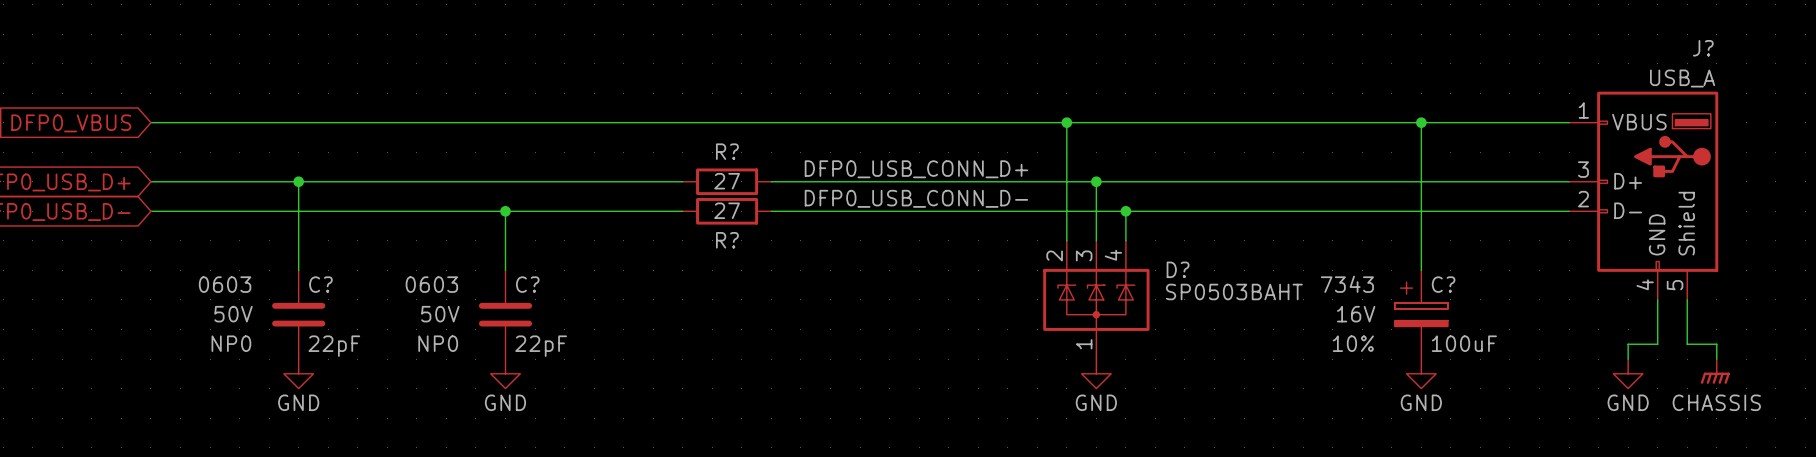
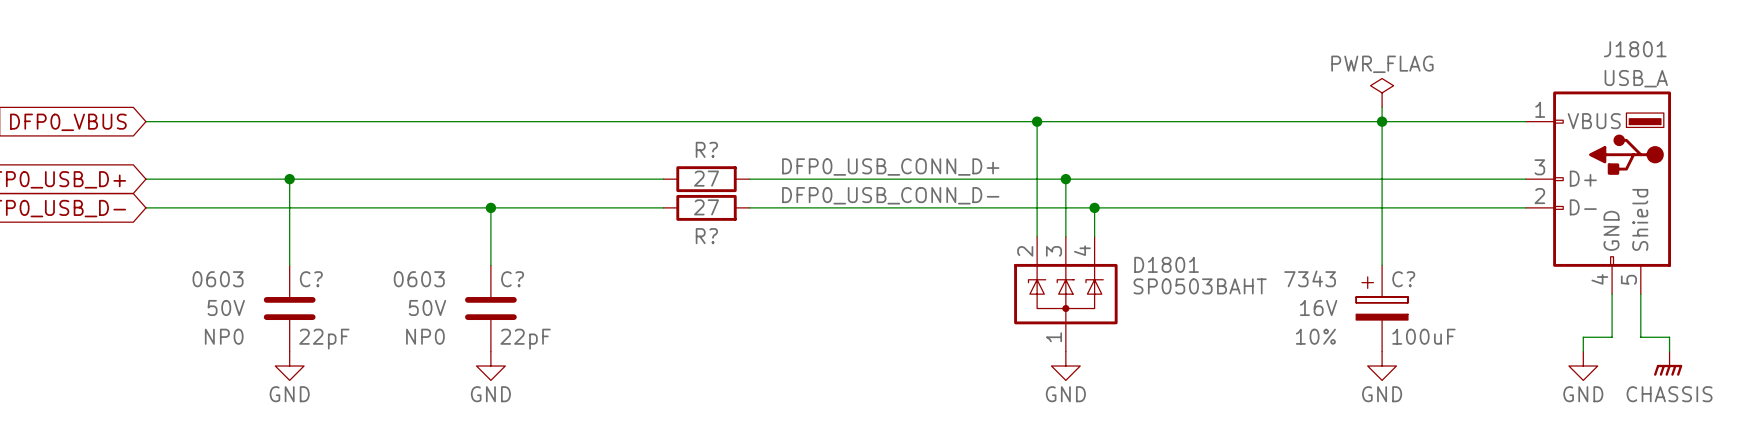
J? name: J? (1703, 48) -> J1801 (1635, 49)
power symbol: none -> PWR_FLAG (1382, 92)
wire: none -> (1382, 107) (1382, 121)
D? name: D? (1178, 269) -> D1801 (1166, 264)

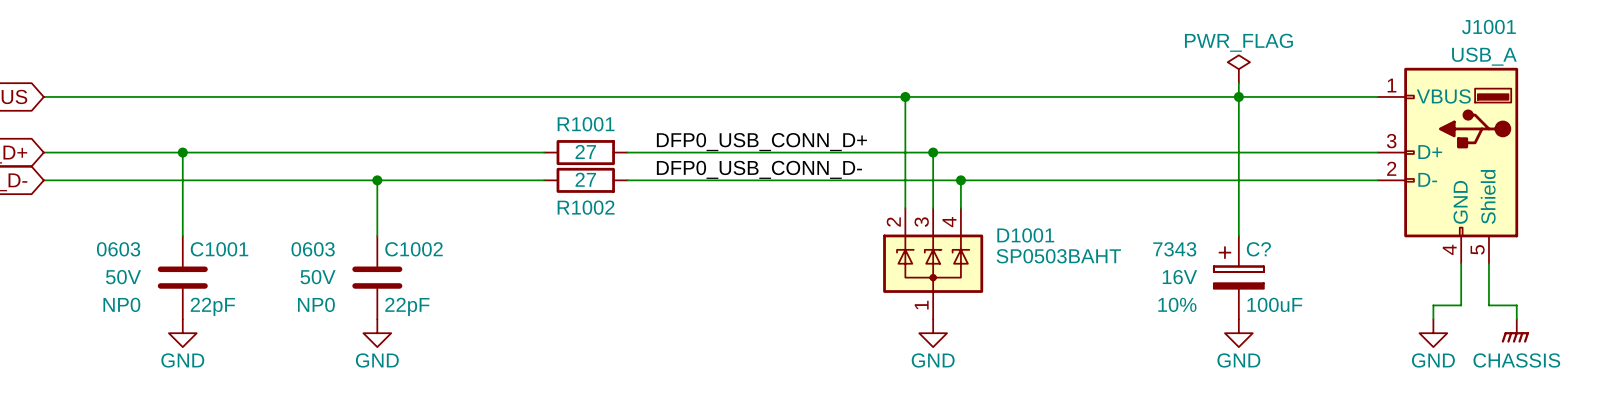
J1801 name: J1801 (1635, 49) -> J1001 (1488, 26)
R? name: R? (706, 149) -> R1001 (586, 124)
R? name: R? (706, 236) -> R1002 (586, 207)
D1801 name: D1801 (1166, 264) -> D1001 (1025, 235)
C? name: C? (311, 279) -> C1001 (219, 249)
C? name: C? (512, 279) -> C1002 (414, 249)

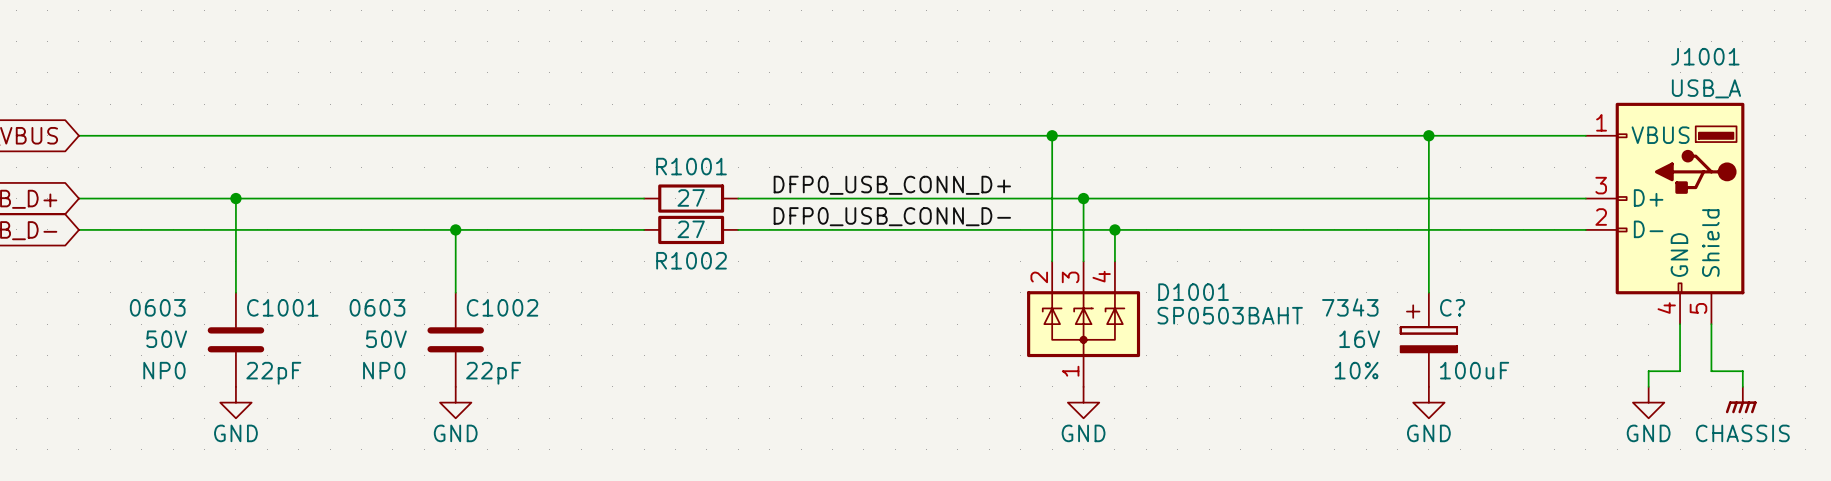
power symbol: PWR_FLAG (1238, 69) -> none
wire: (1238, 83) (1238, 96) -> none

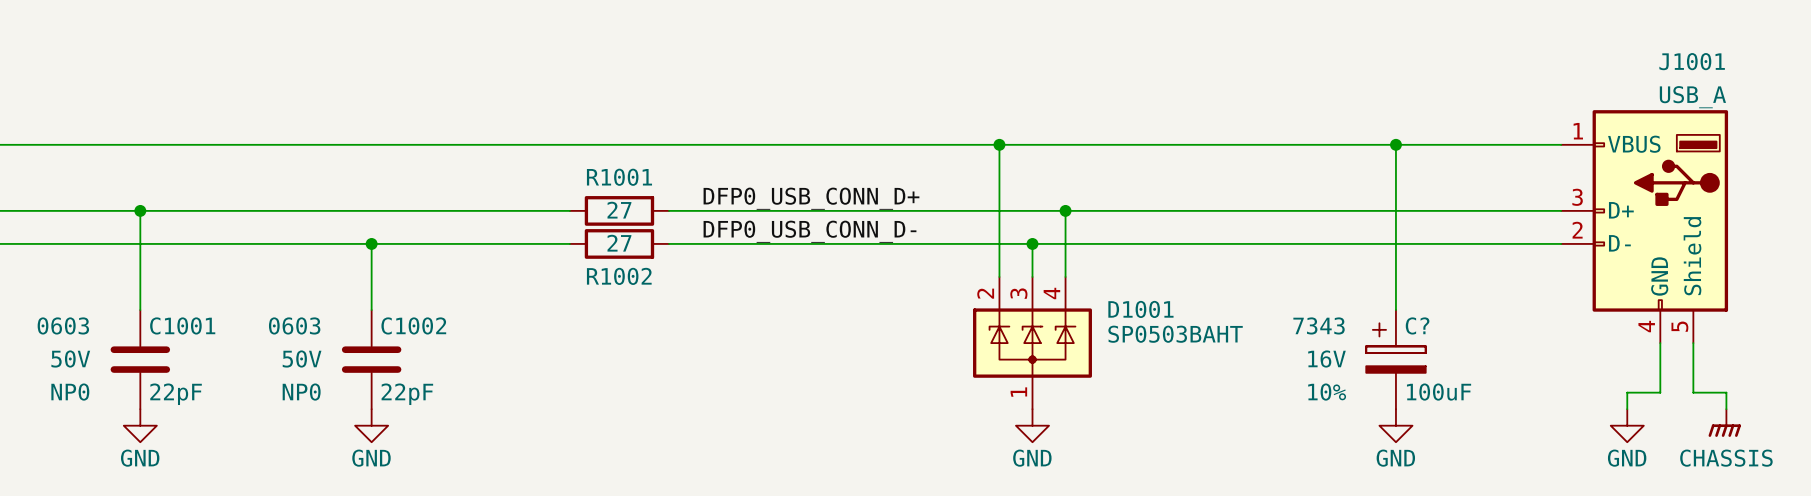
wire: (1083, 198) (1083, 229) -> (1065, 210) (1065, 243)
junction: (1083, 198) -> none
junction: none -> (1065, 210)
junction: none -> (1032, 243)
junction: (1114, 229) -> none

